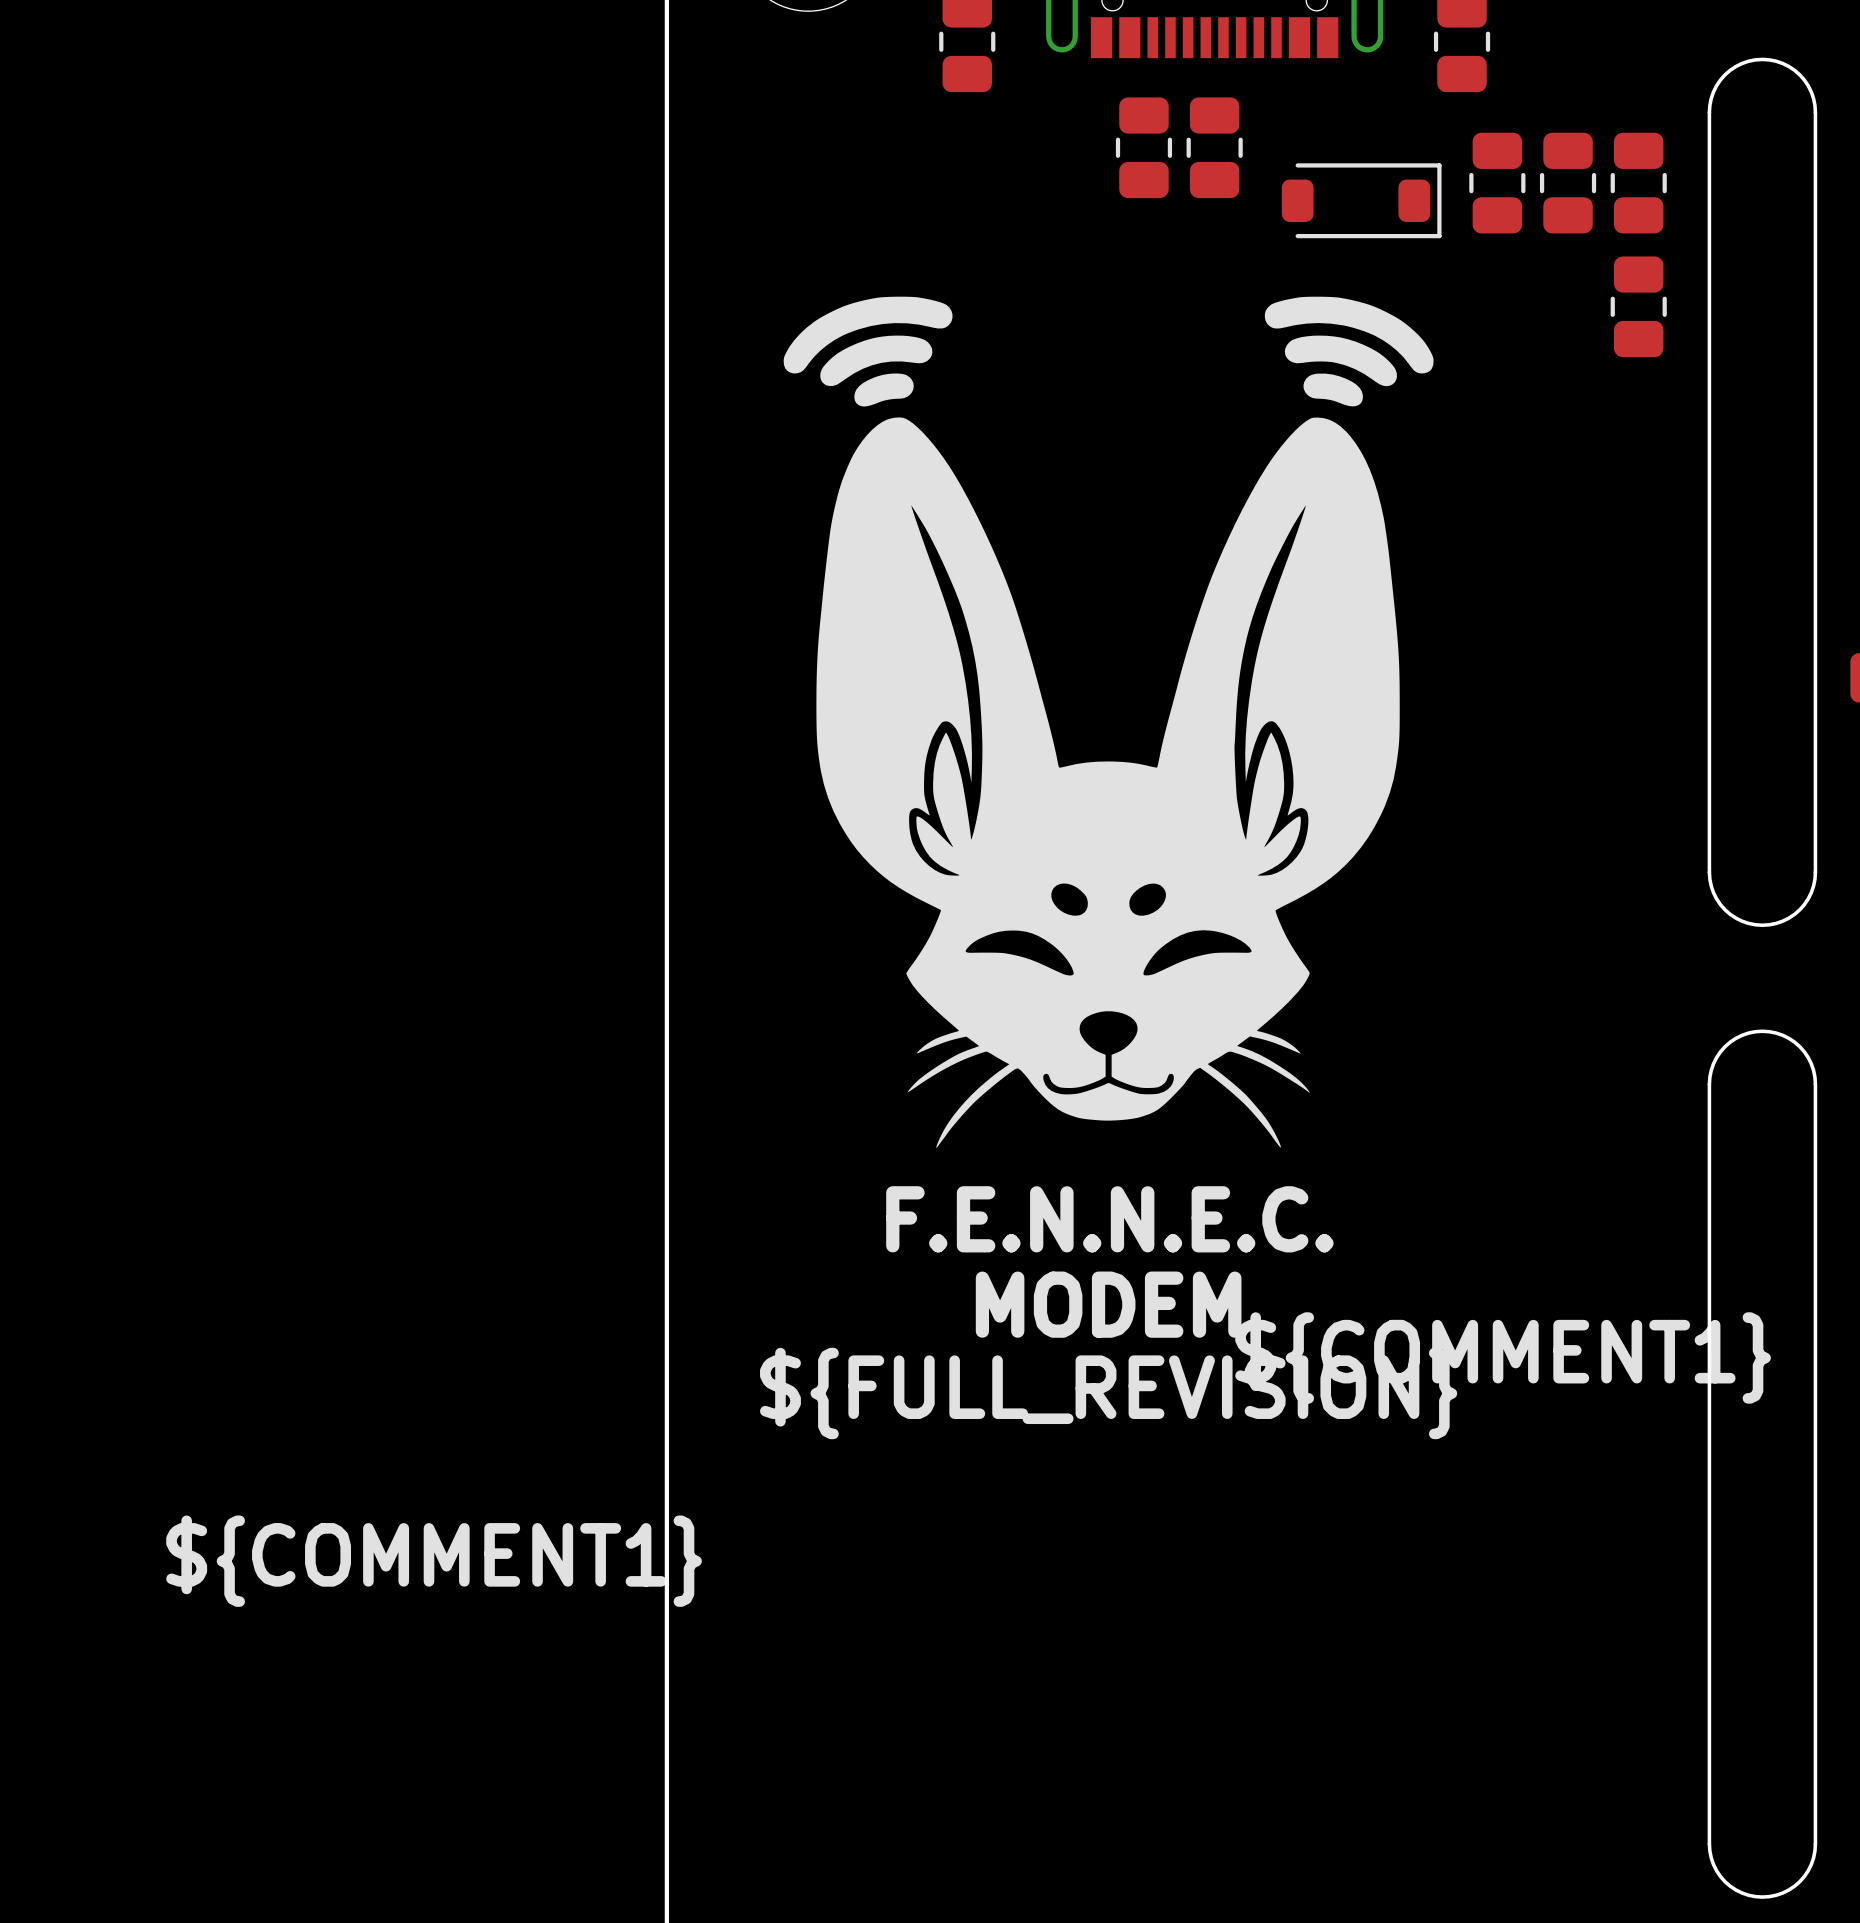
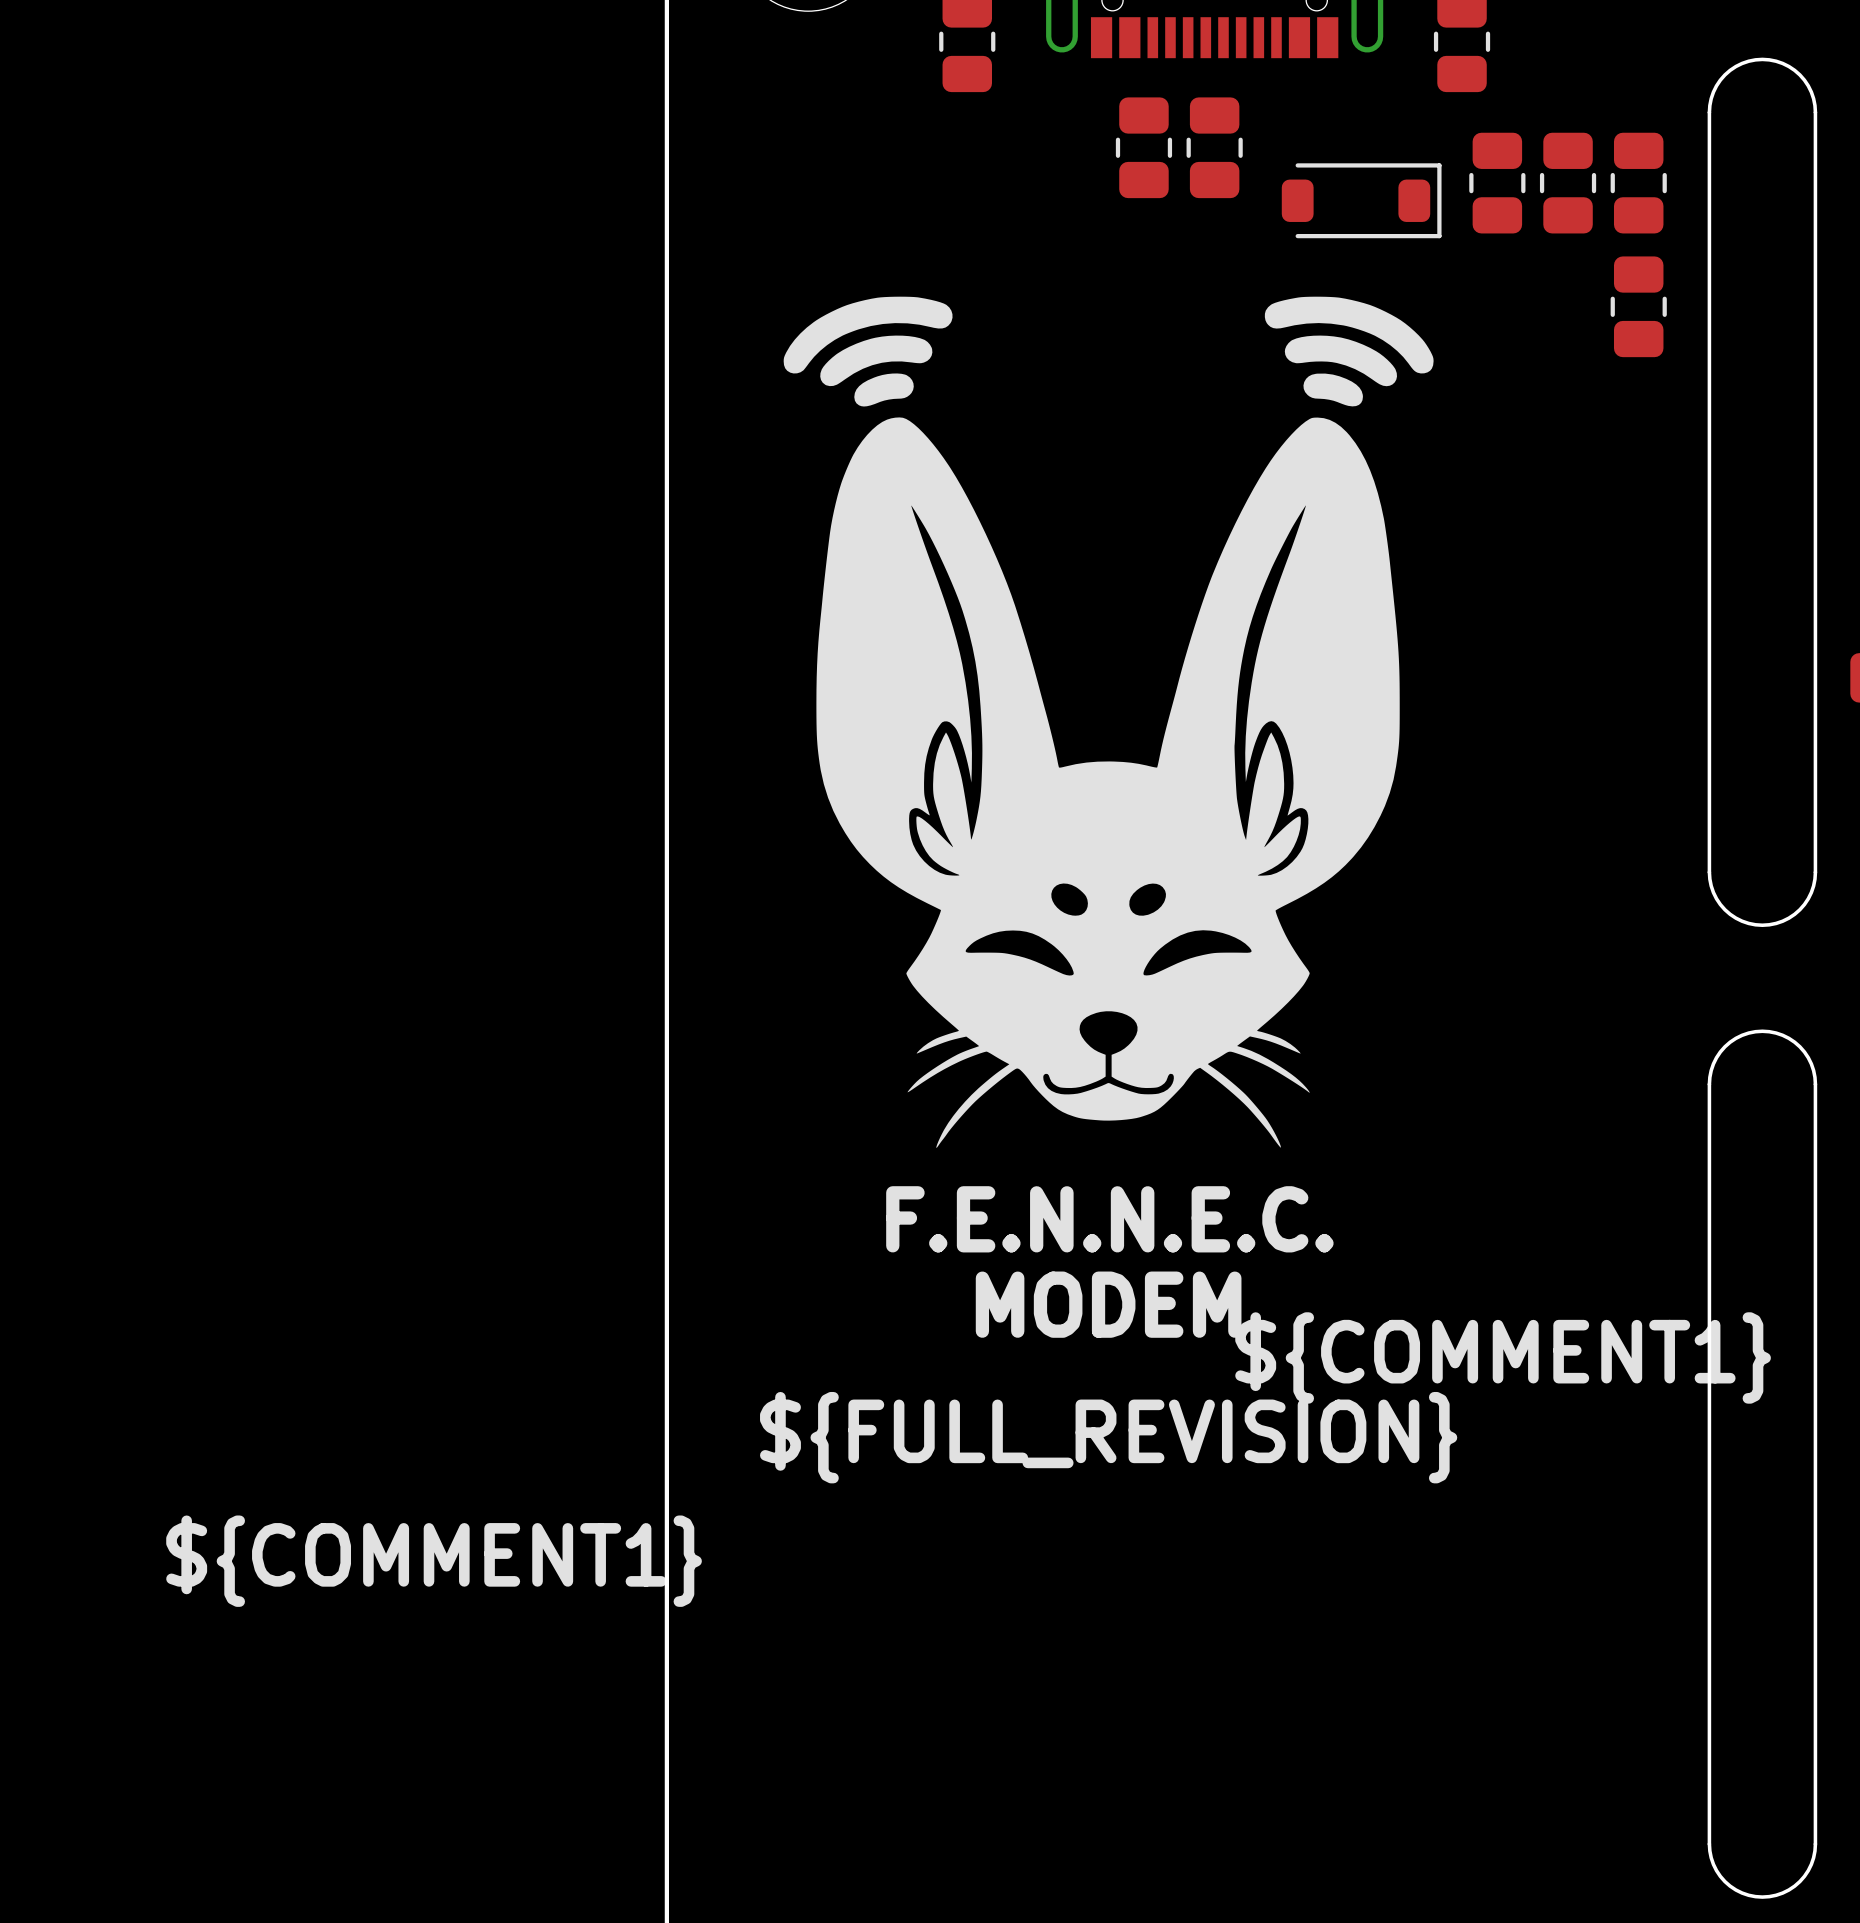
text position: ${FULL_REVISION} (1108, 1393) -> ${FULL_REVISION} (1108, 1437)

